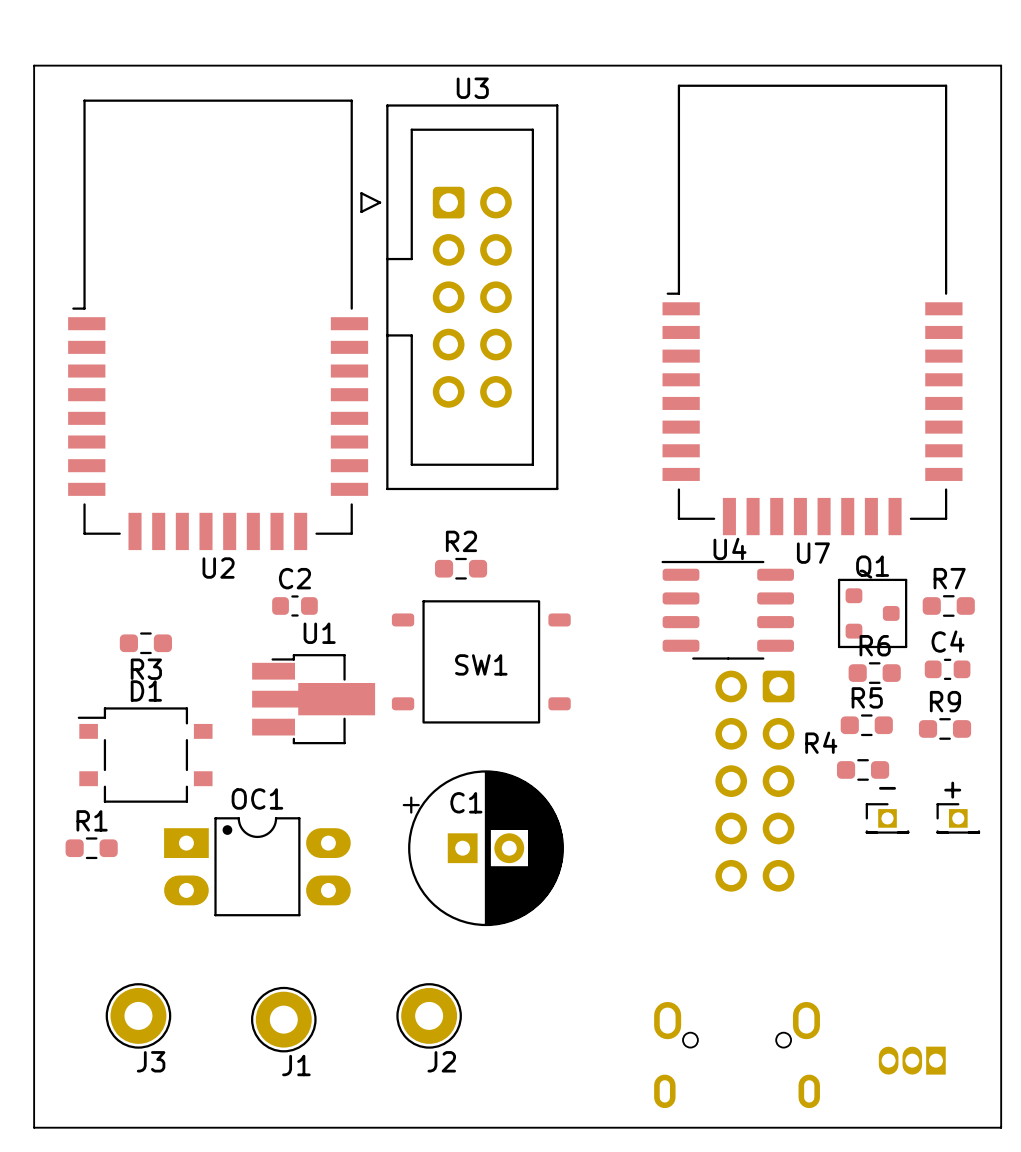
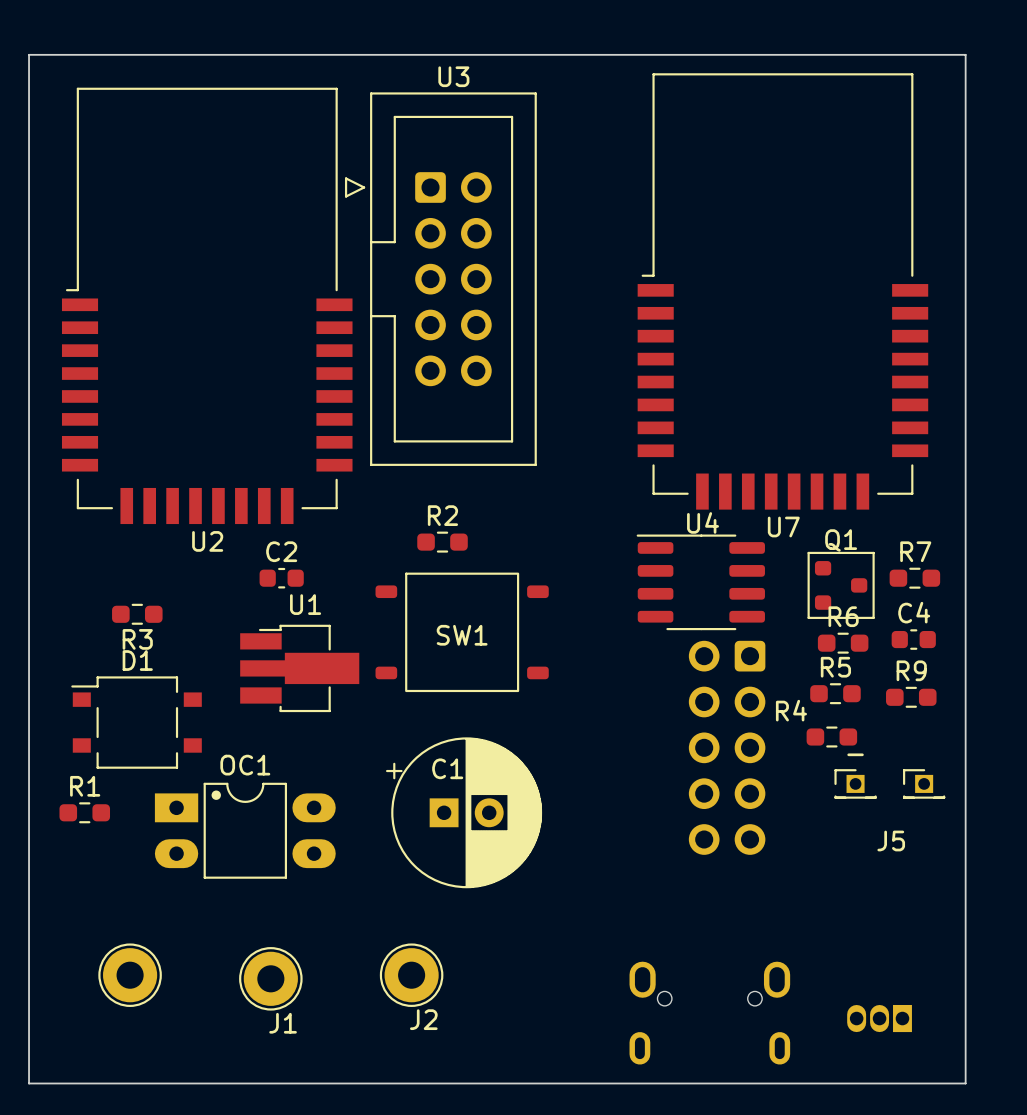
J5 text: + (952, 790) -> none
J5 name: none -> J5 (891, 840)
J3 name: J3 (151, 1061) -> none

